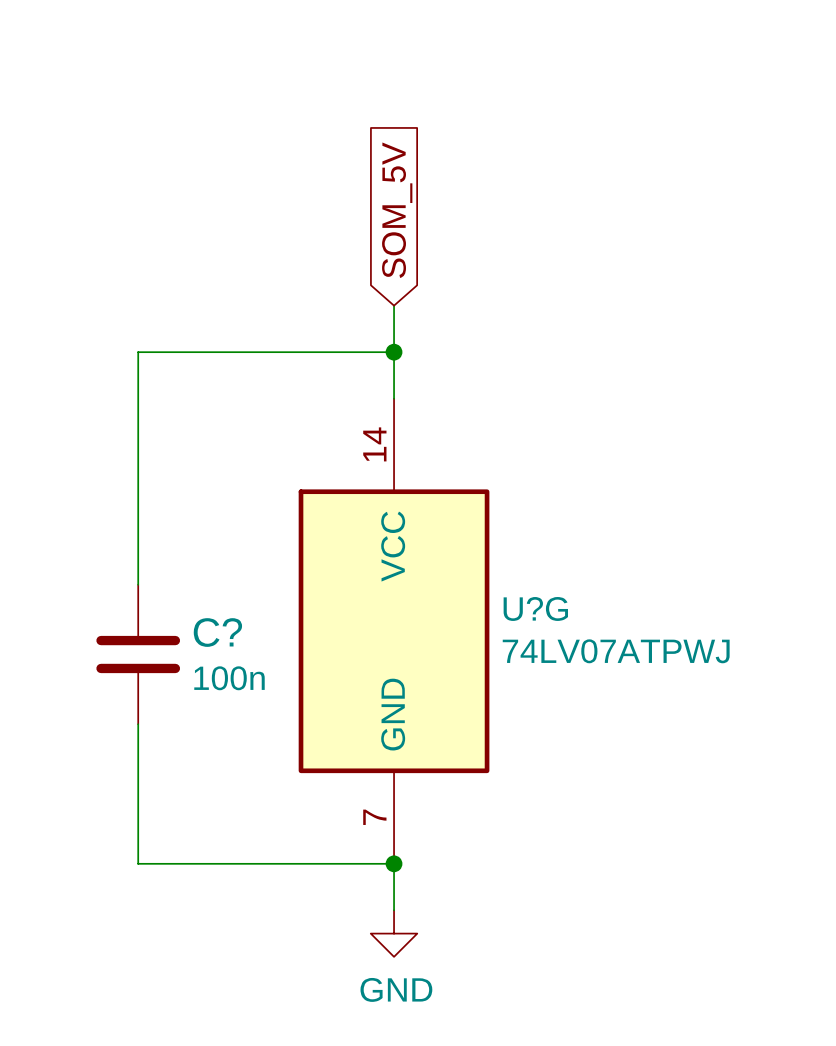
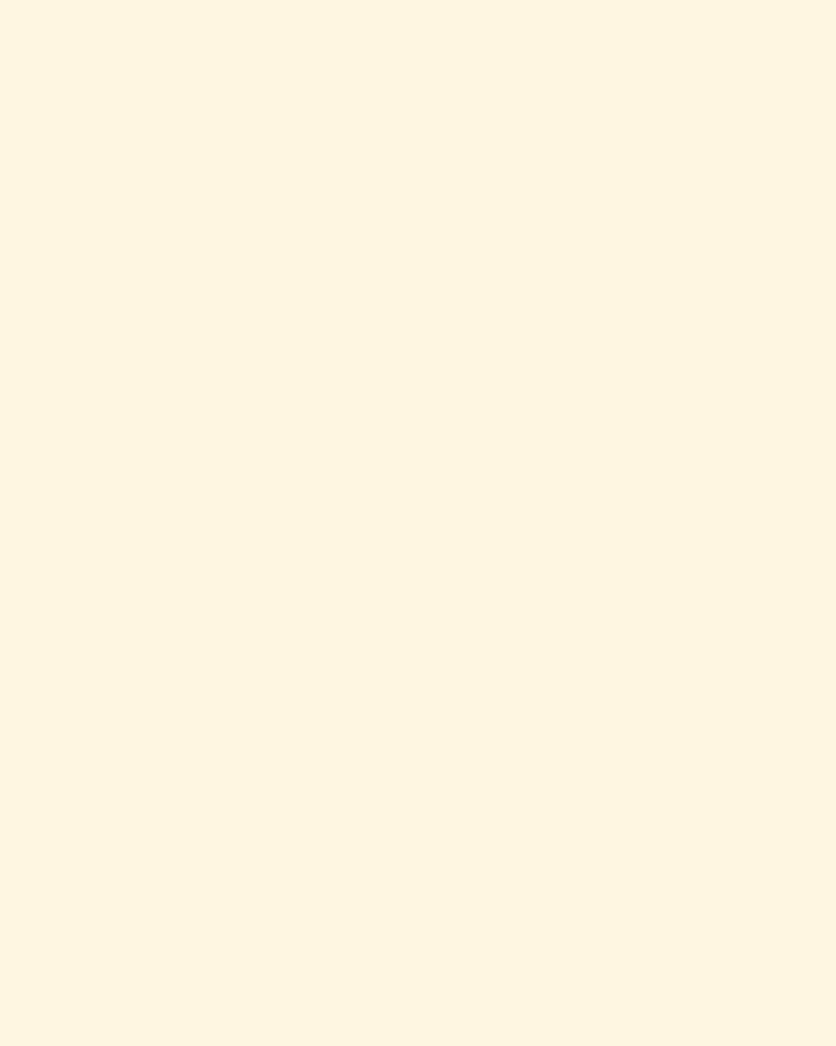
global label: SOM_5V (397, 210) -> none
wire: (394, 305) (394, 398) -> none
wire: (394, 352) (138, 352) (138, 584) -> none
junction: (394, 352) -> none
U?G: 74LV07ATPWJ (394, 631) -> none
C?: (138, 654) -> none
wire: (138, 724) (138, 863) (394, 863) (394, 910) -> none
junction: (394, 863) -> none
power symbol: GND (394, 933) -> none

